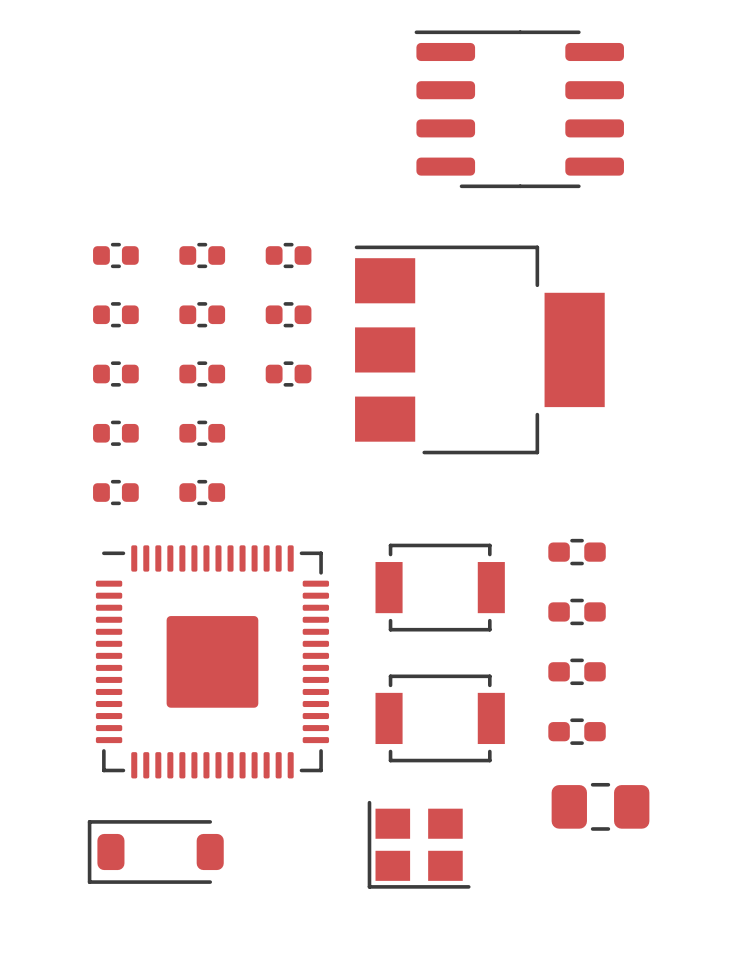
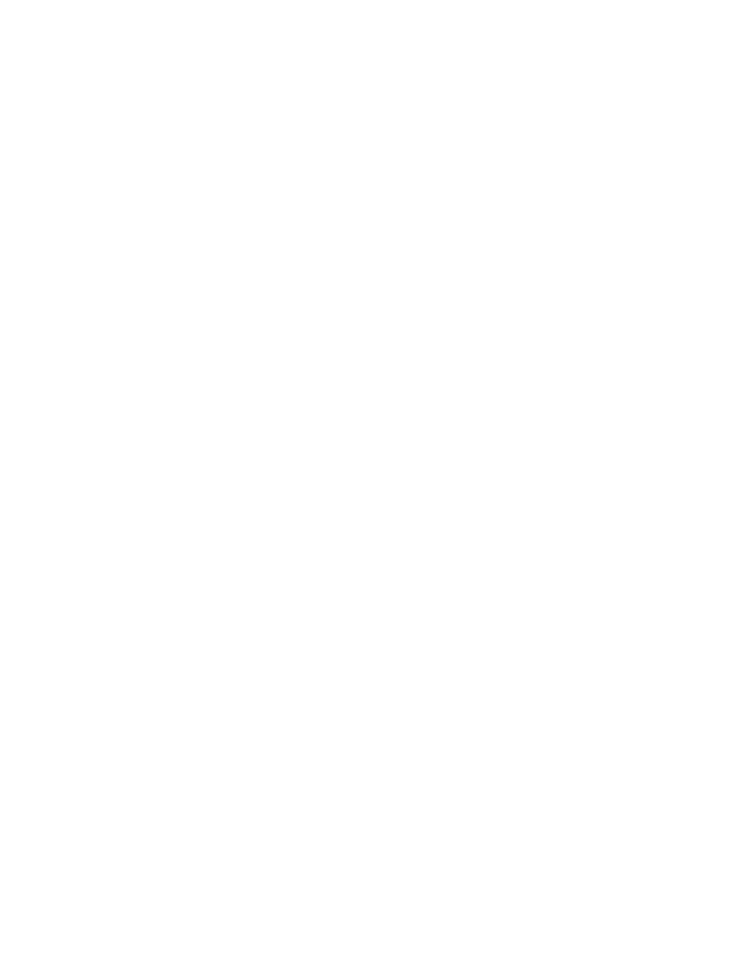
part: (519, 109) -> none
part: (115, 255) -> none
part: (202, 255) -> none
part: (288, 255) -> none
part: (115, 314) -> none
part: (202, 314) -> none
part: (288, 314) -> none
part: (479, 349) -> none
part: (115, 374) -> none
part: (202, 374) -> none
part: (288, 374) -> none
part: (115, 433) -> none
part: (202, 433) -> none
part: (115, 492) -> none
part: (202, 492) -> none
part: (577, 552) -> none
part: (440, 587) -> none
part: (577, 611) -> none
part: (212, 661) -> none
part: (577, 671) -> none
part: (440, 718) -> none
part: (577, 731) -> none
part: (600, 806) -> none
part: (419, 844) -> none
part: (155, 852) -> none

